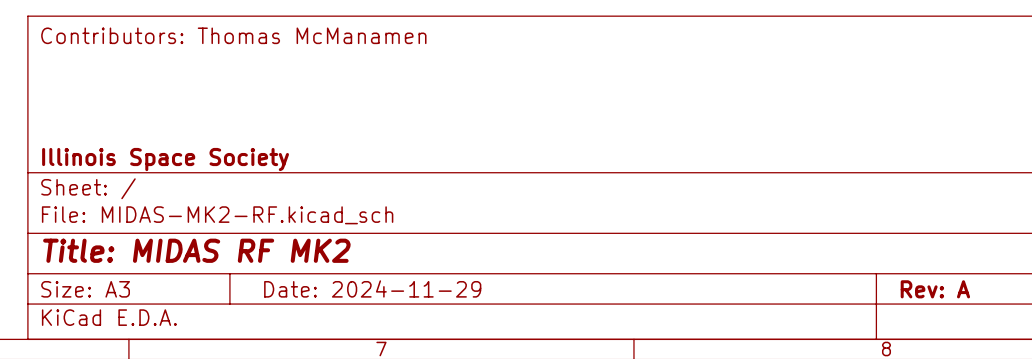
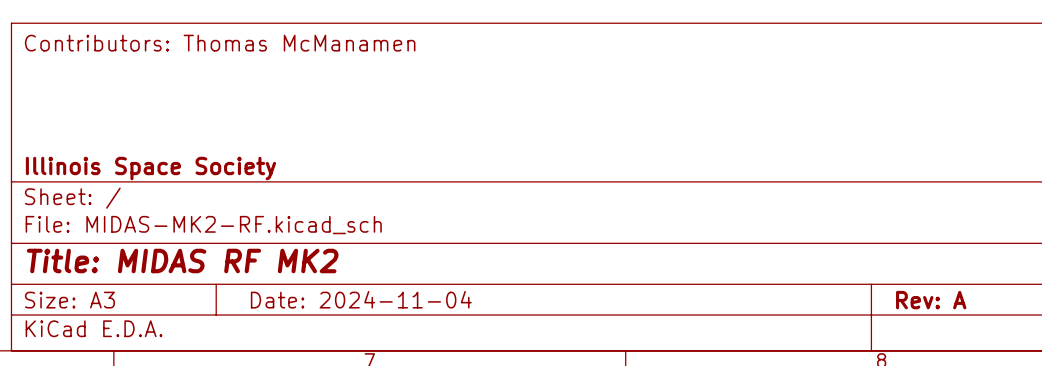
title block: Date: 2024-11-29 (372, 288) -> Date: 2024-11-04 (361, 299)

